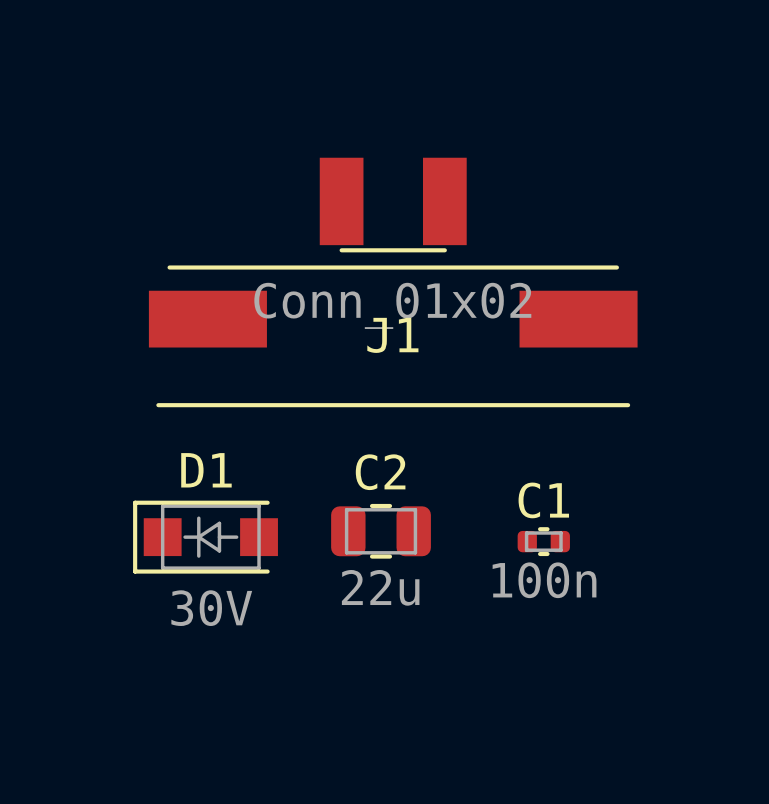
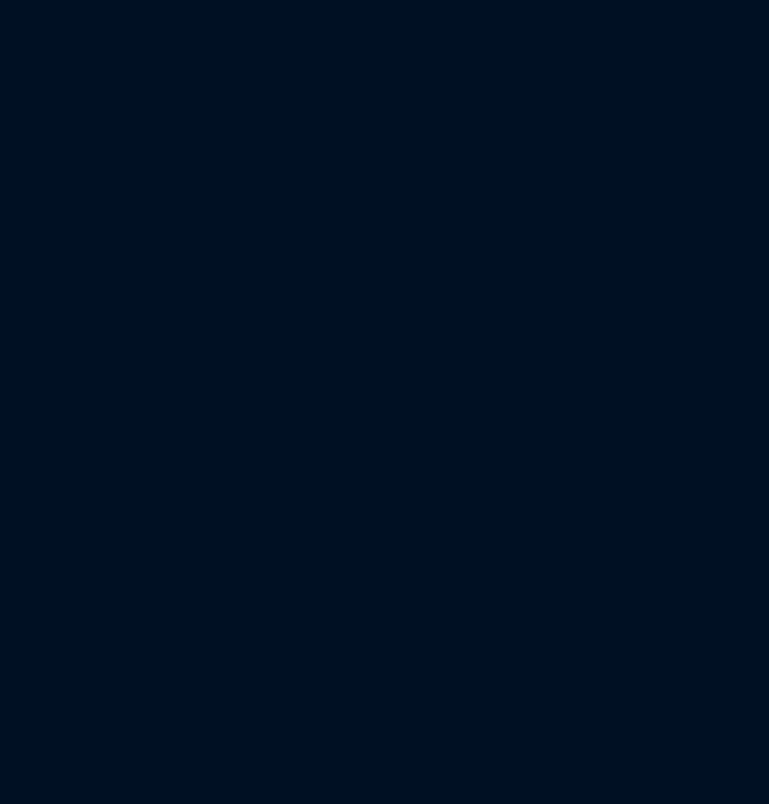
J1: Conn_01x02 (393, 282) -> none
C2: 22u (381, 531) -> none
D1: 30V (205, 537) -> none
C1: 100n (543, 541) -> none

